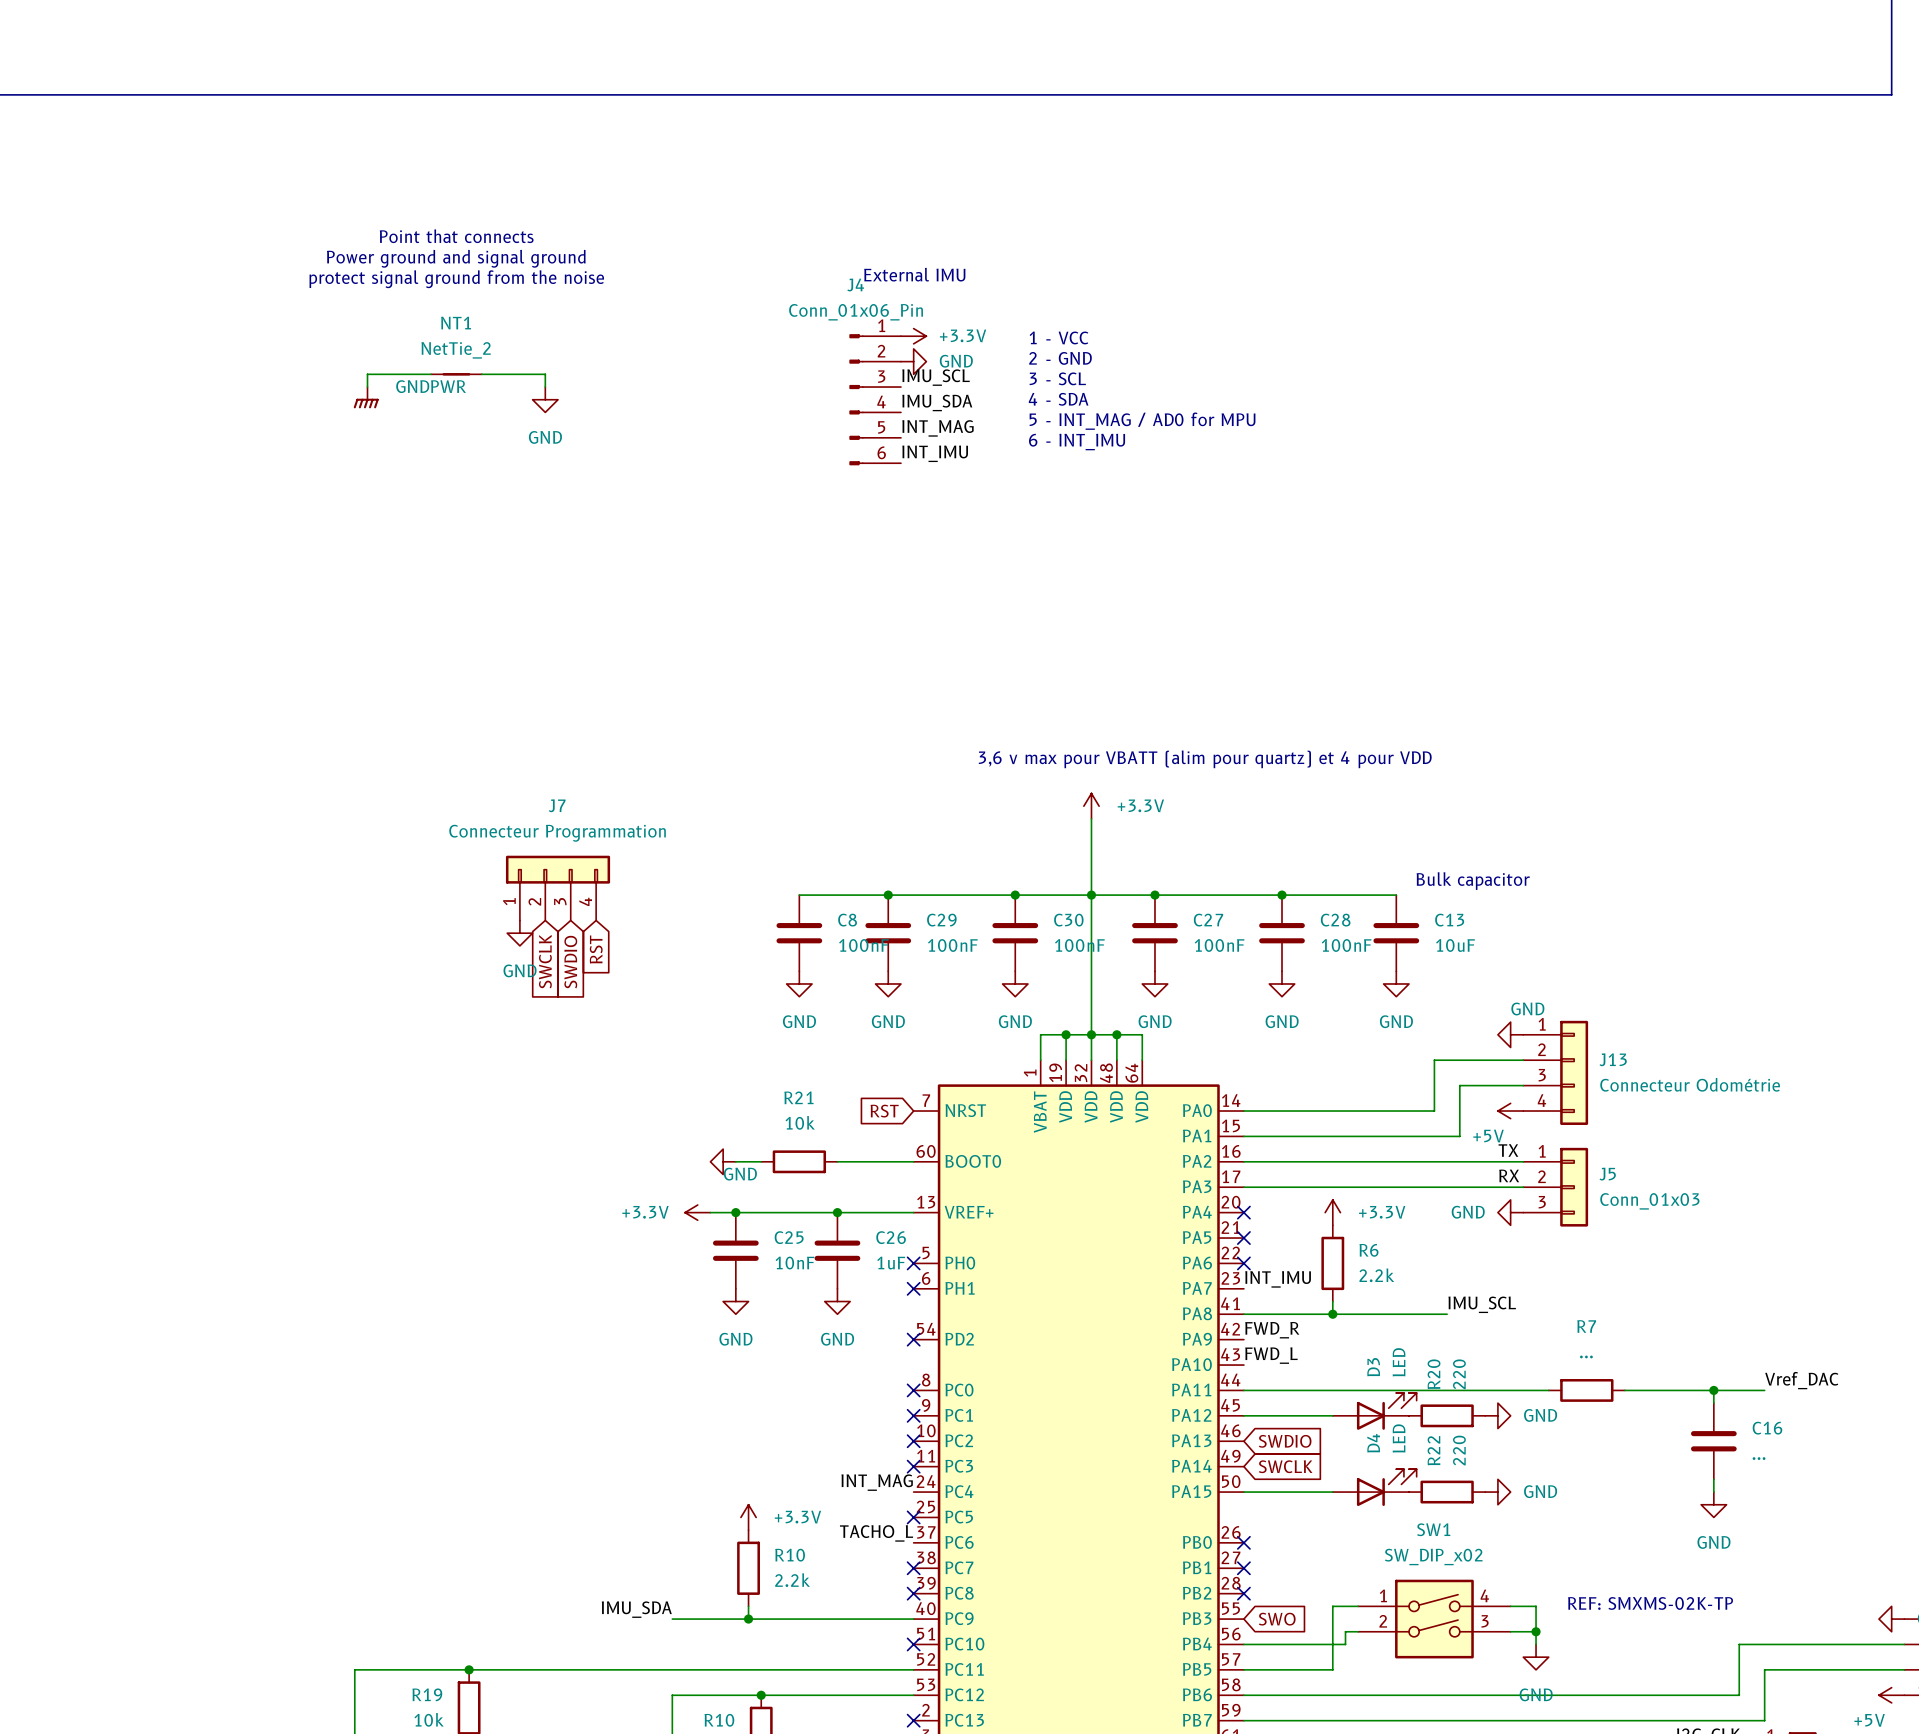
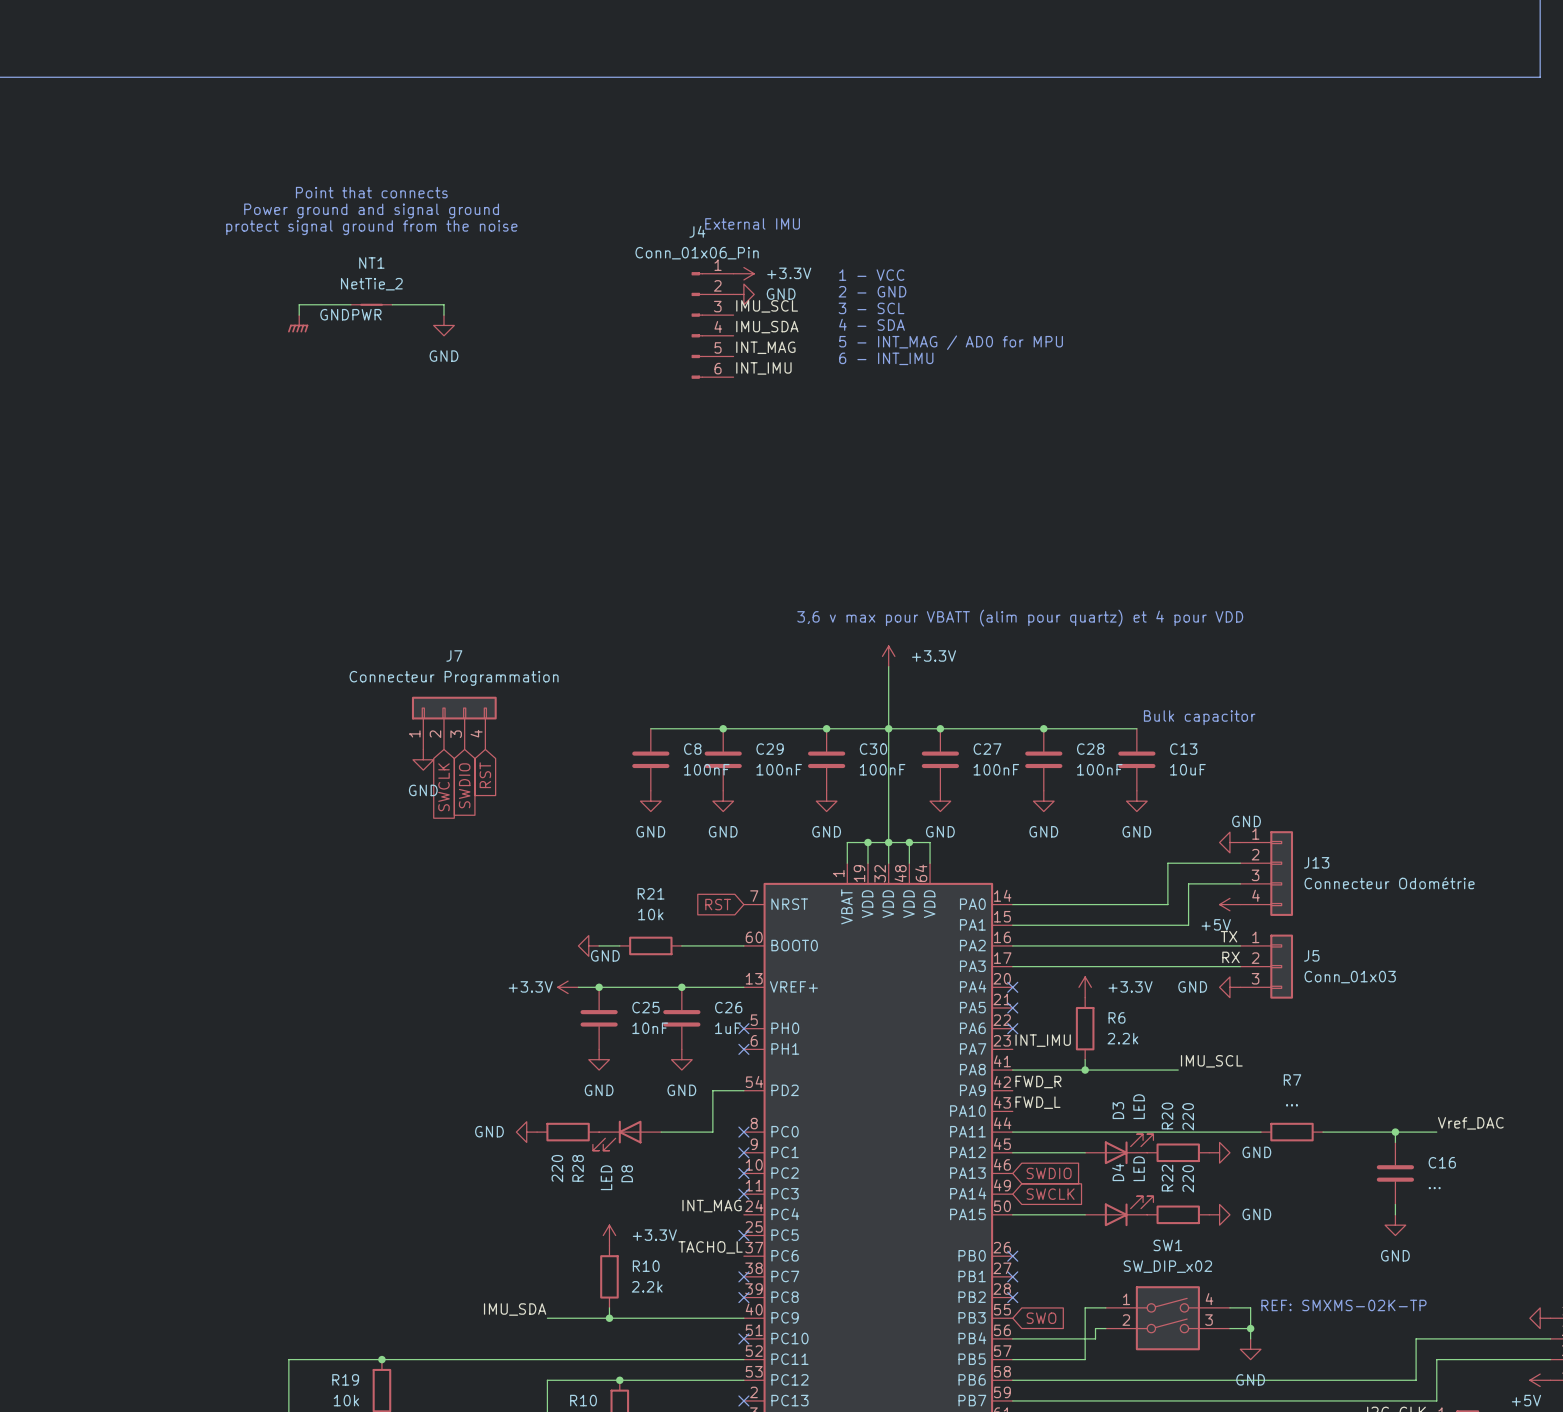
wire: none -> (743, 1090) (712, 1090) (712, 1132) (661, 1132)
no-connect mark: (913, 1339) -> none
power symbol: none -> GND (526, 1132)
R28: none -> 220 (568, 1132)
D8: none -> LED (627, 1135)

